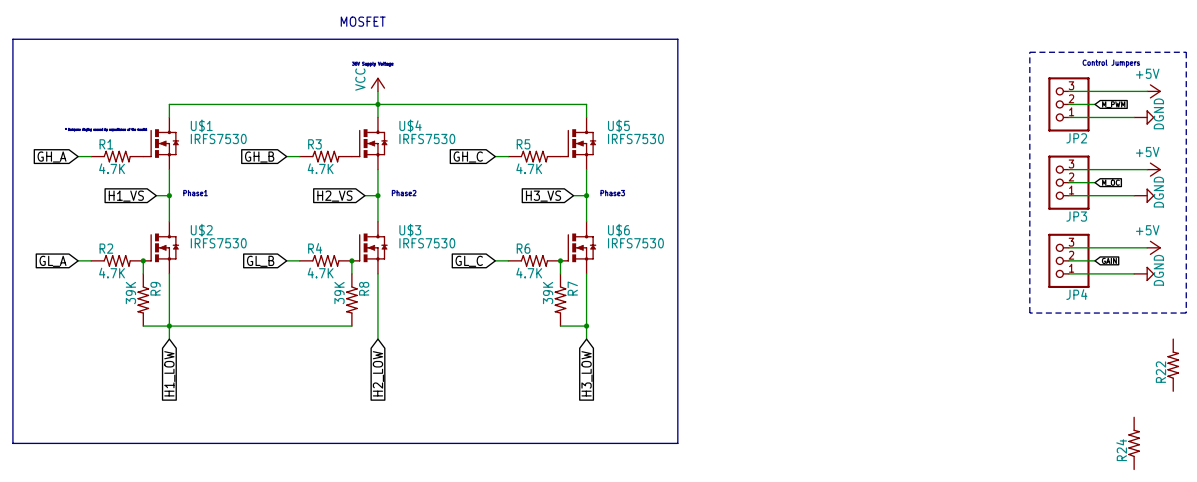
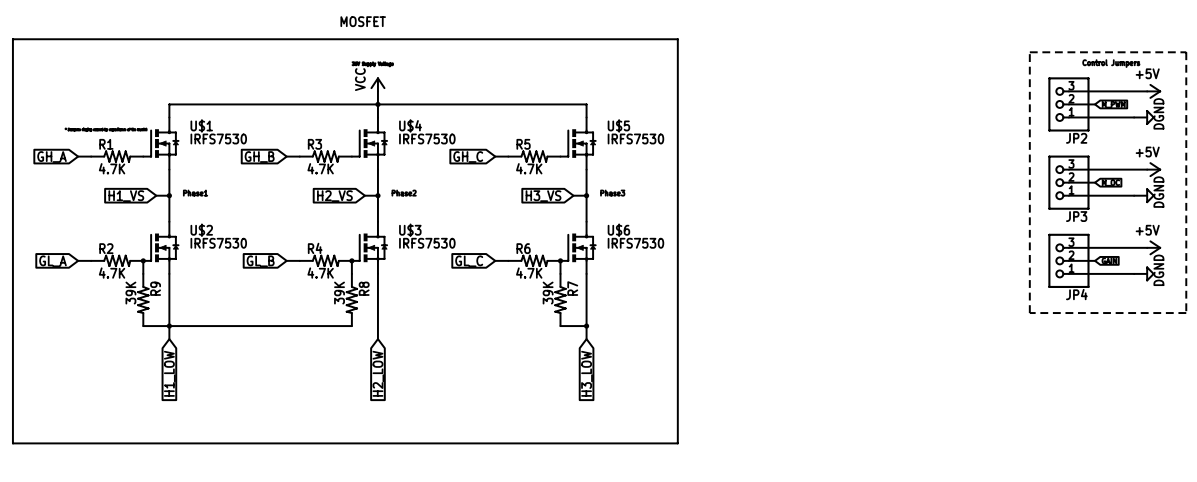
R22: (1173, 365) -> none
R24: (1134, 443) -> none

